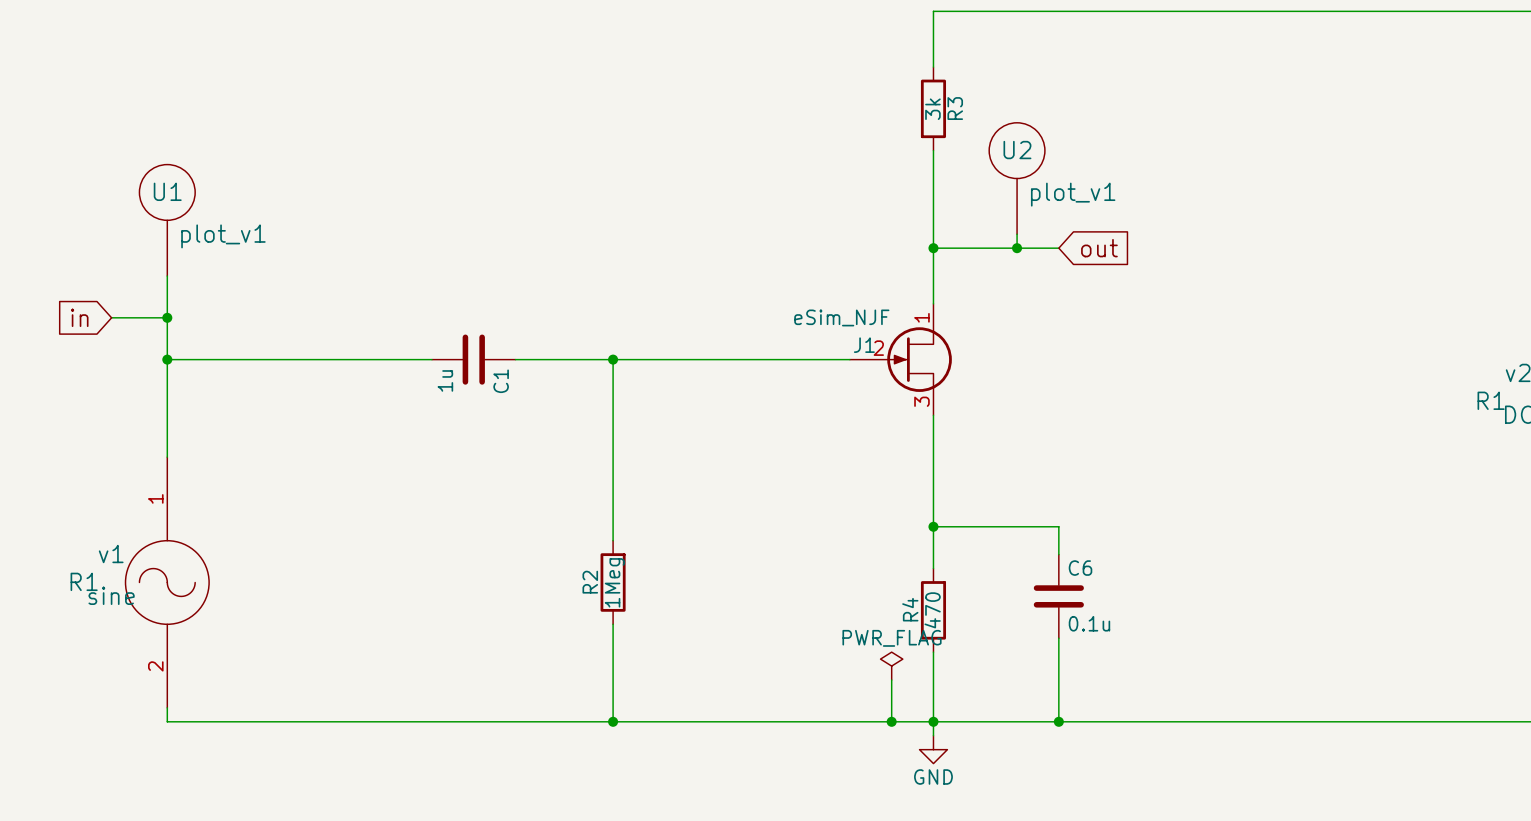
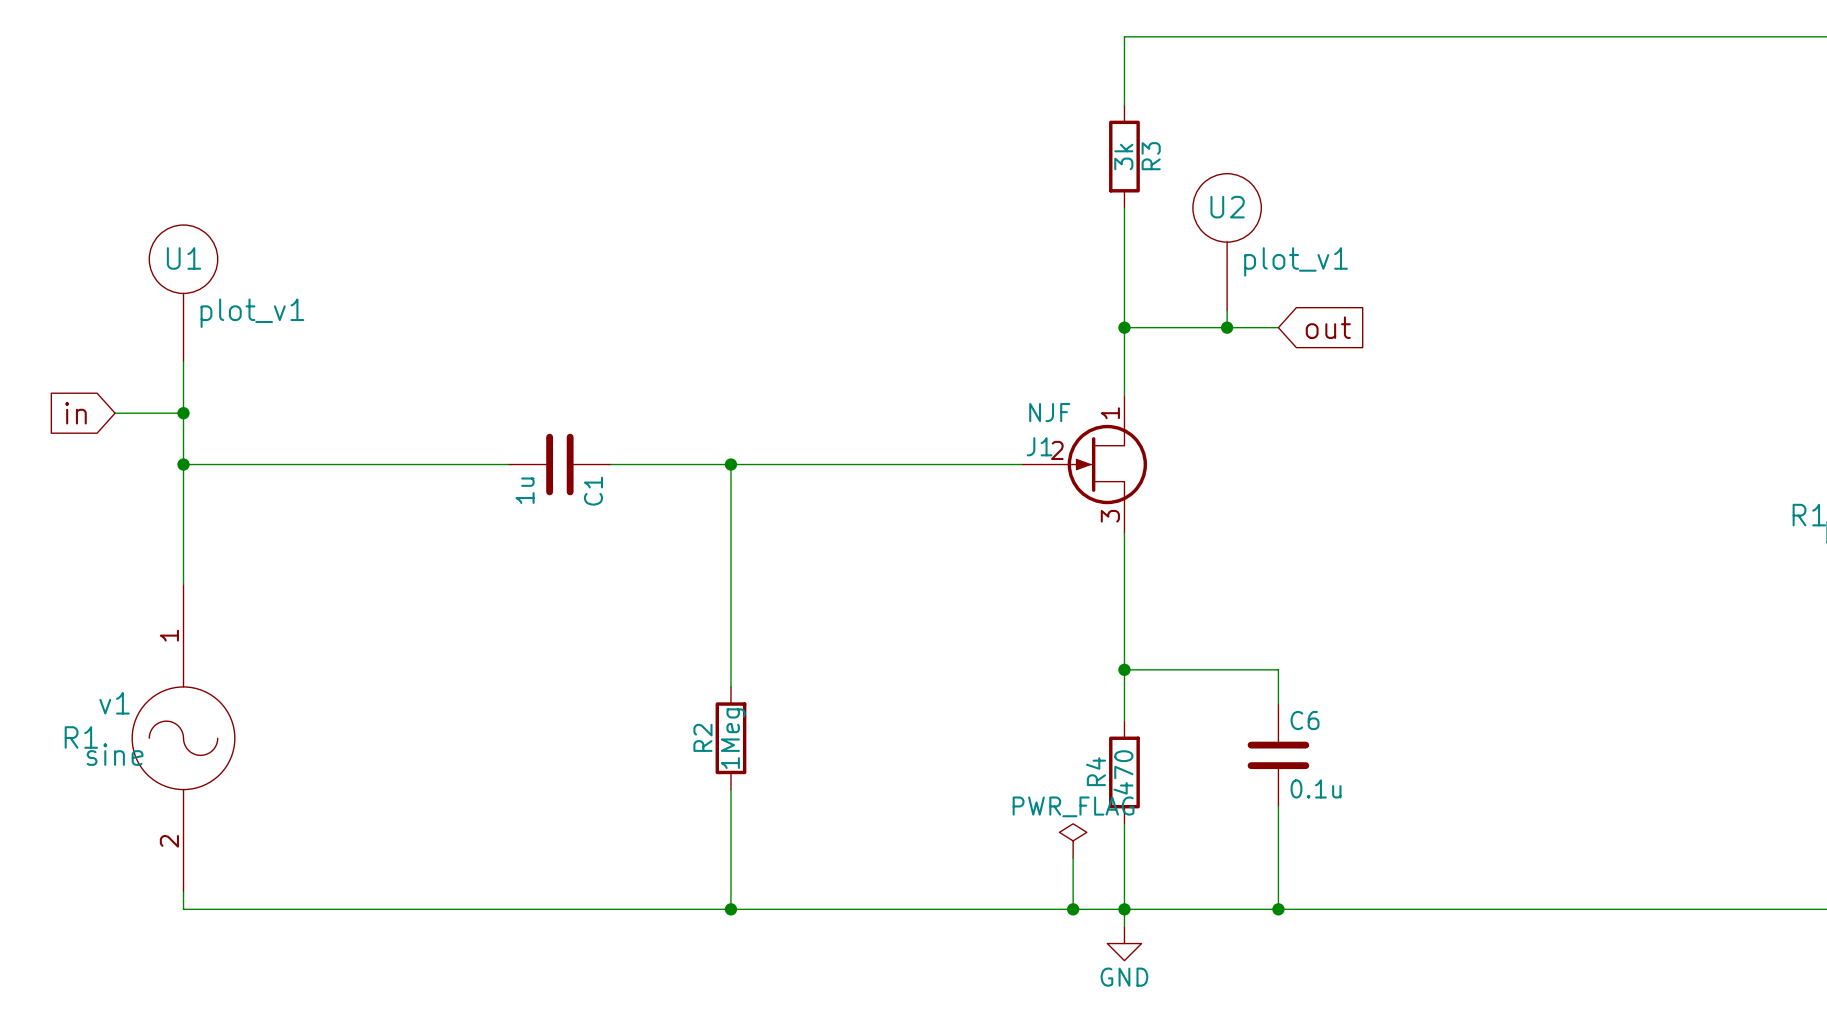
J1 value: eSim_NJF (841, 317) -> NJF (1049, 412)

